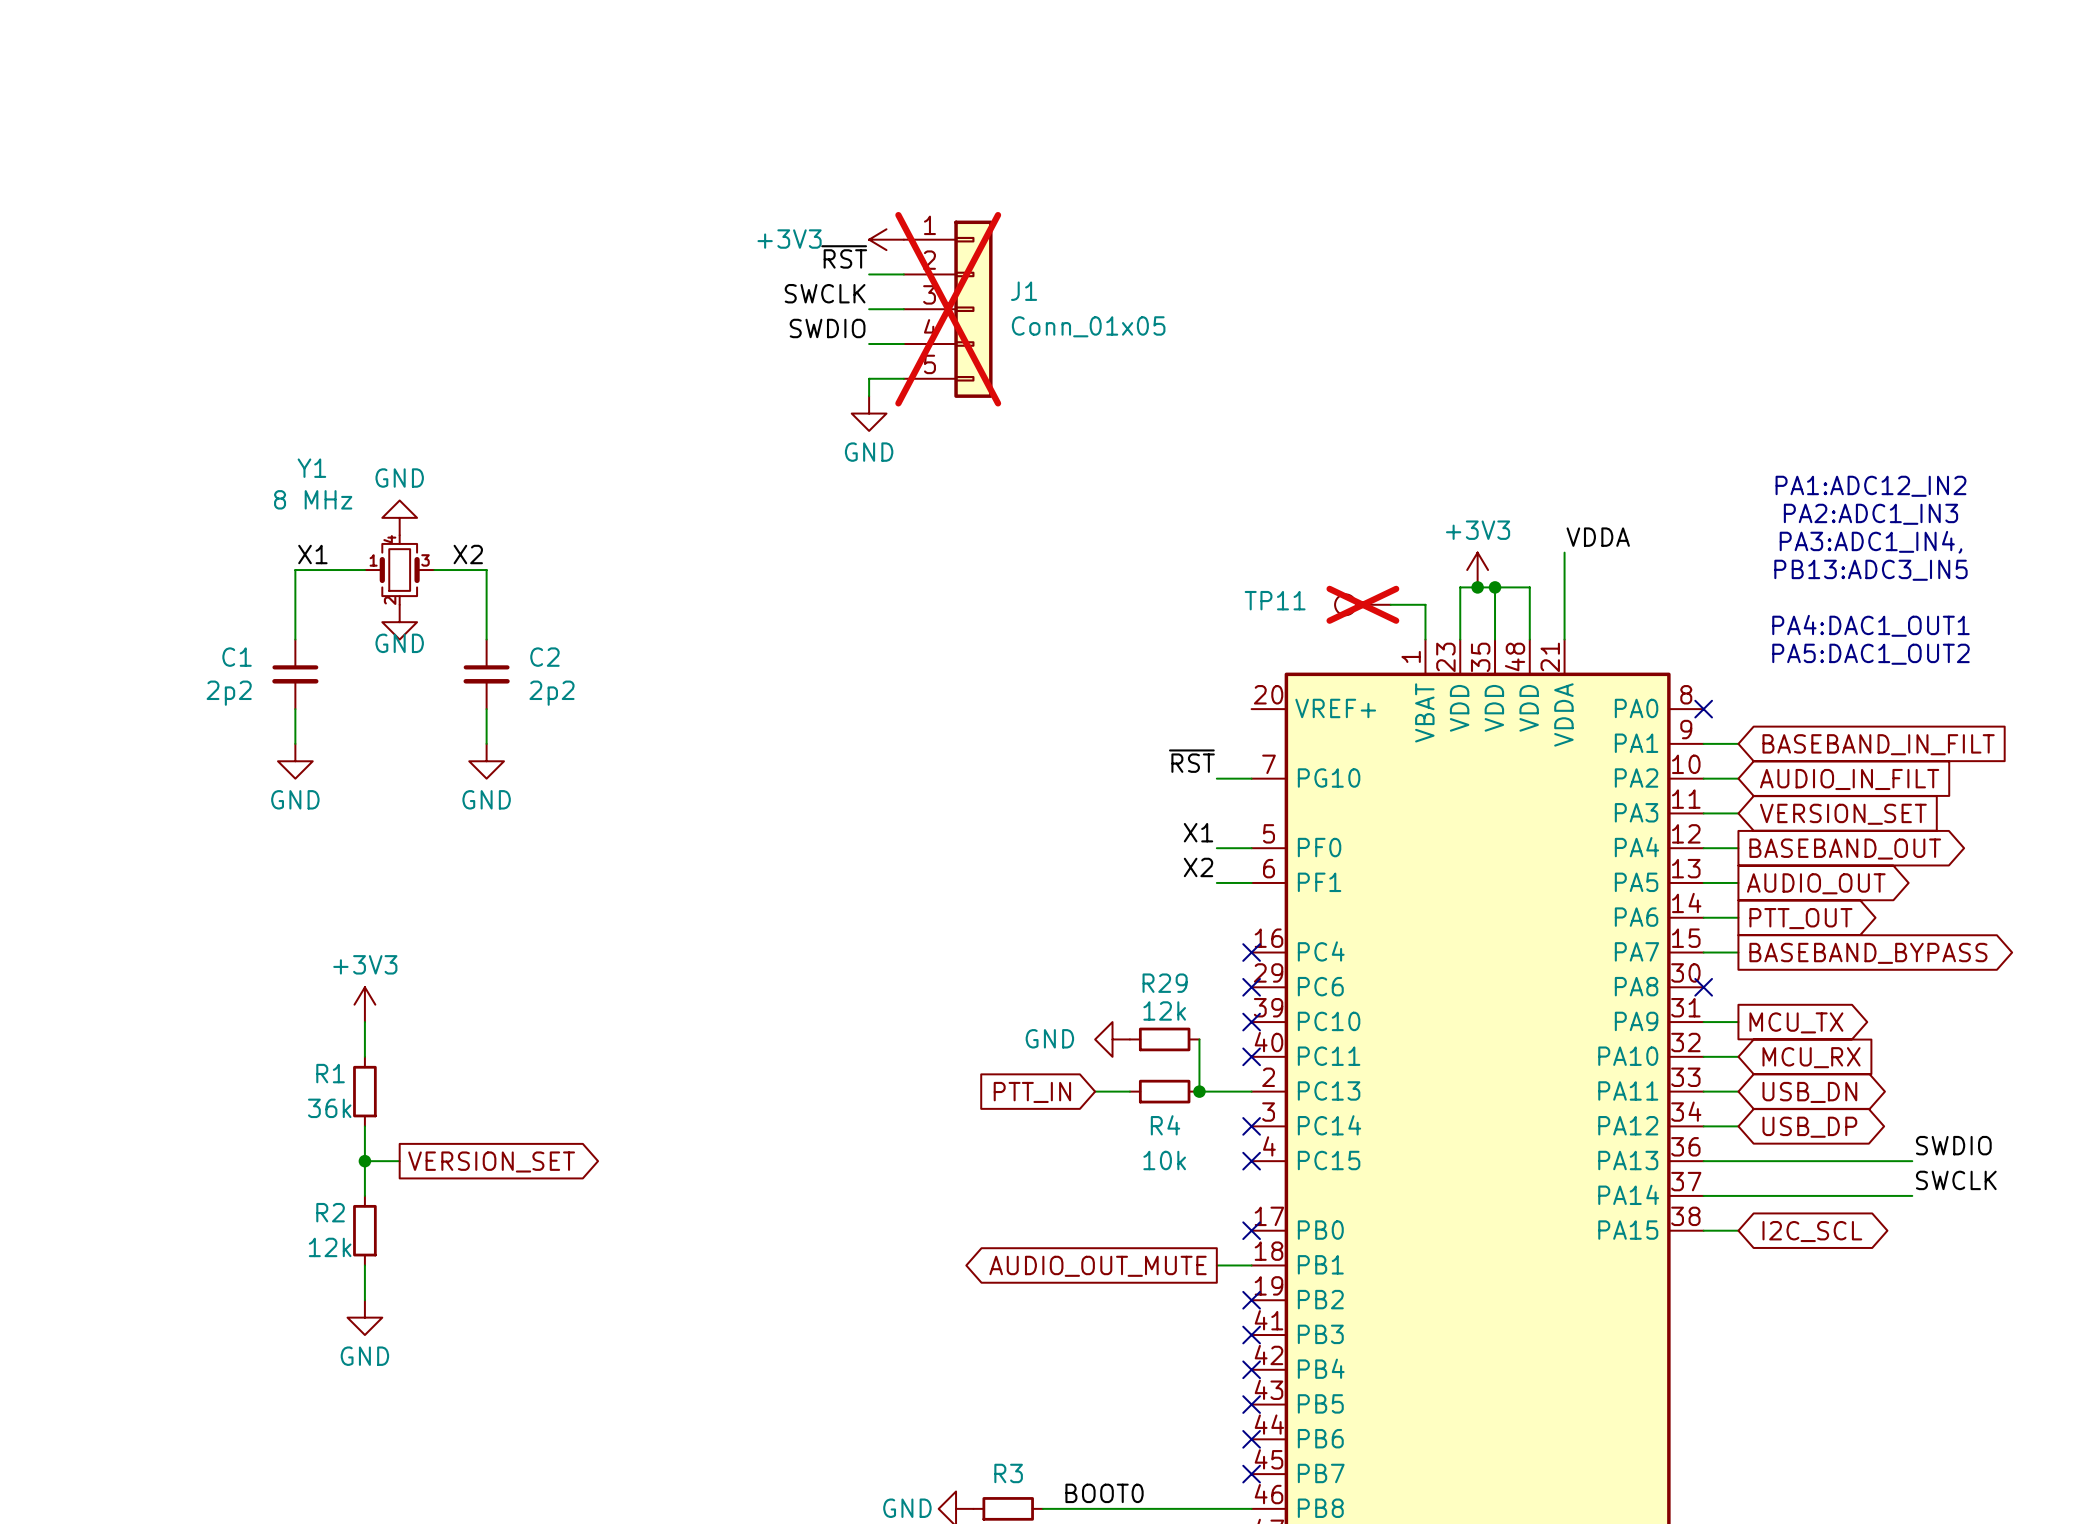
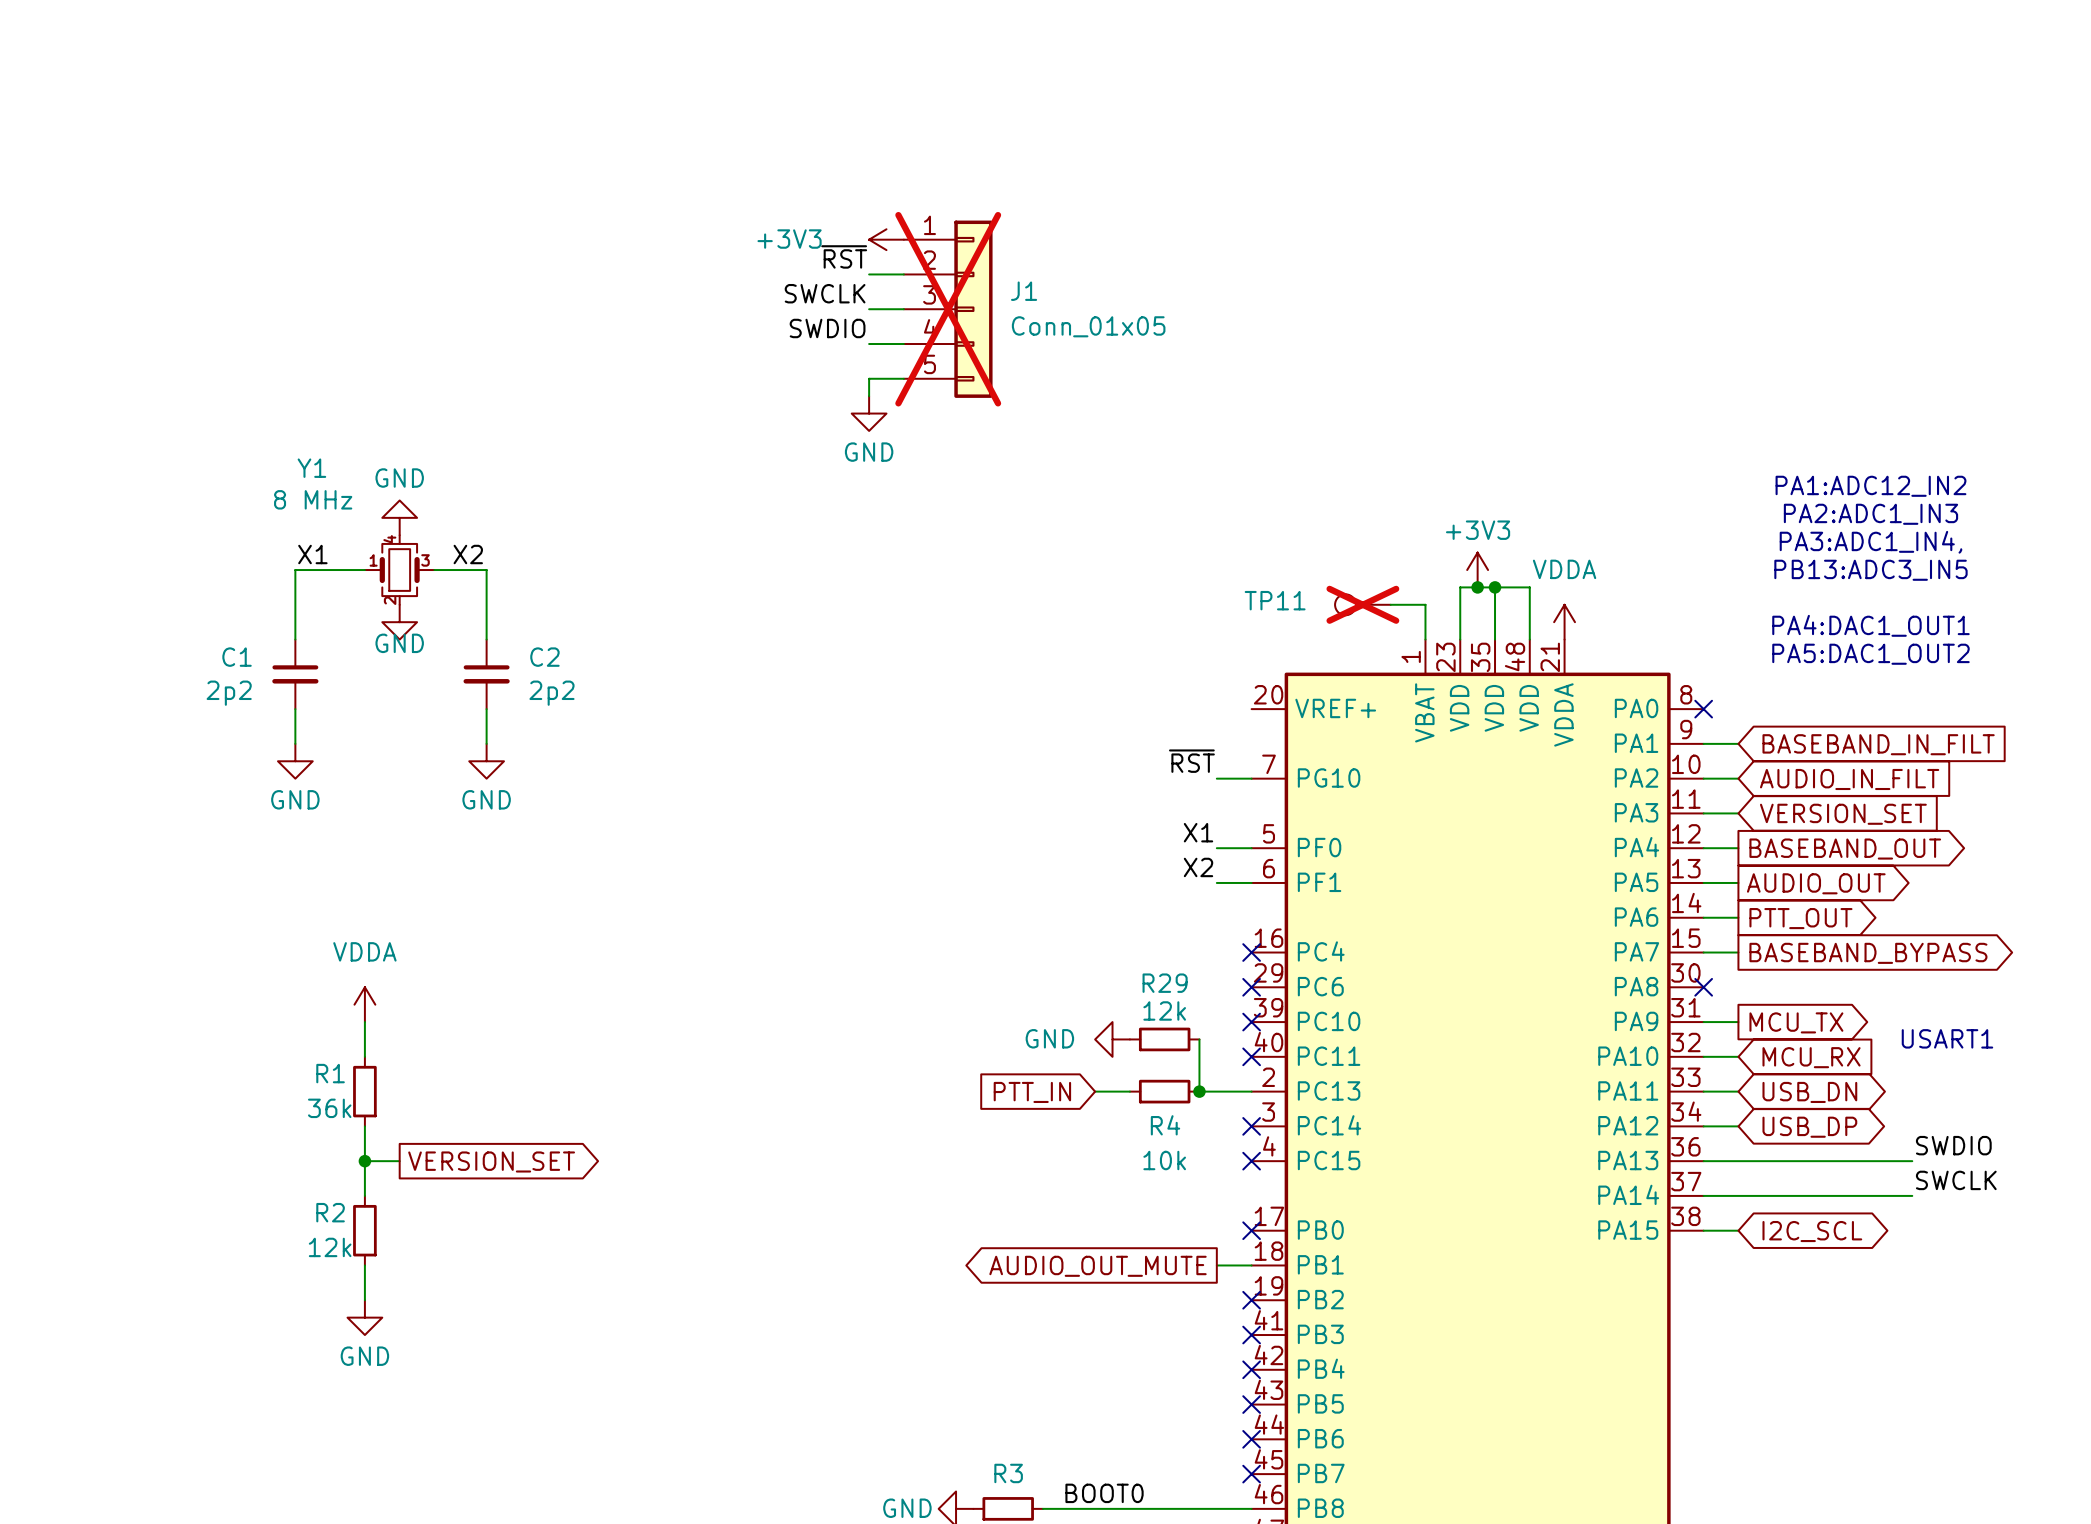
label: VDDA (1598, 537) -> none
wire: (1564, 552) (1564, 639) -> none
power symbol: none -> VDDA (1564, 622)
power symbol: +3V3 (364, 1004) -> VDDA (364, 1004)
text: none -> USART1 (1947, 1038)

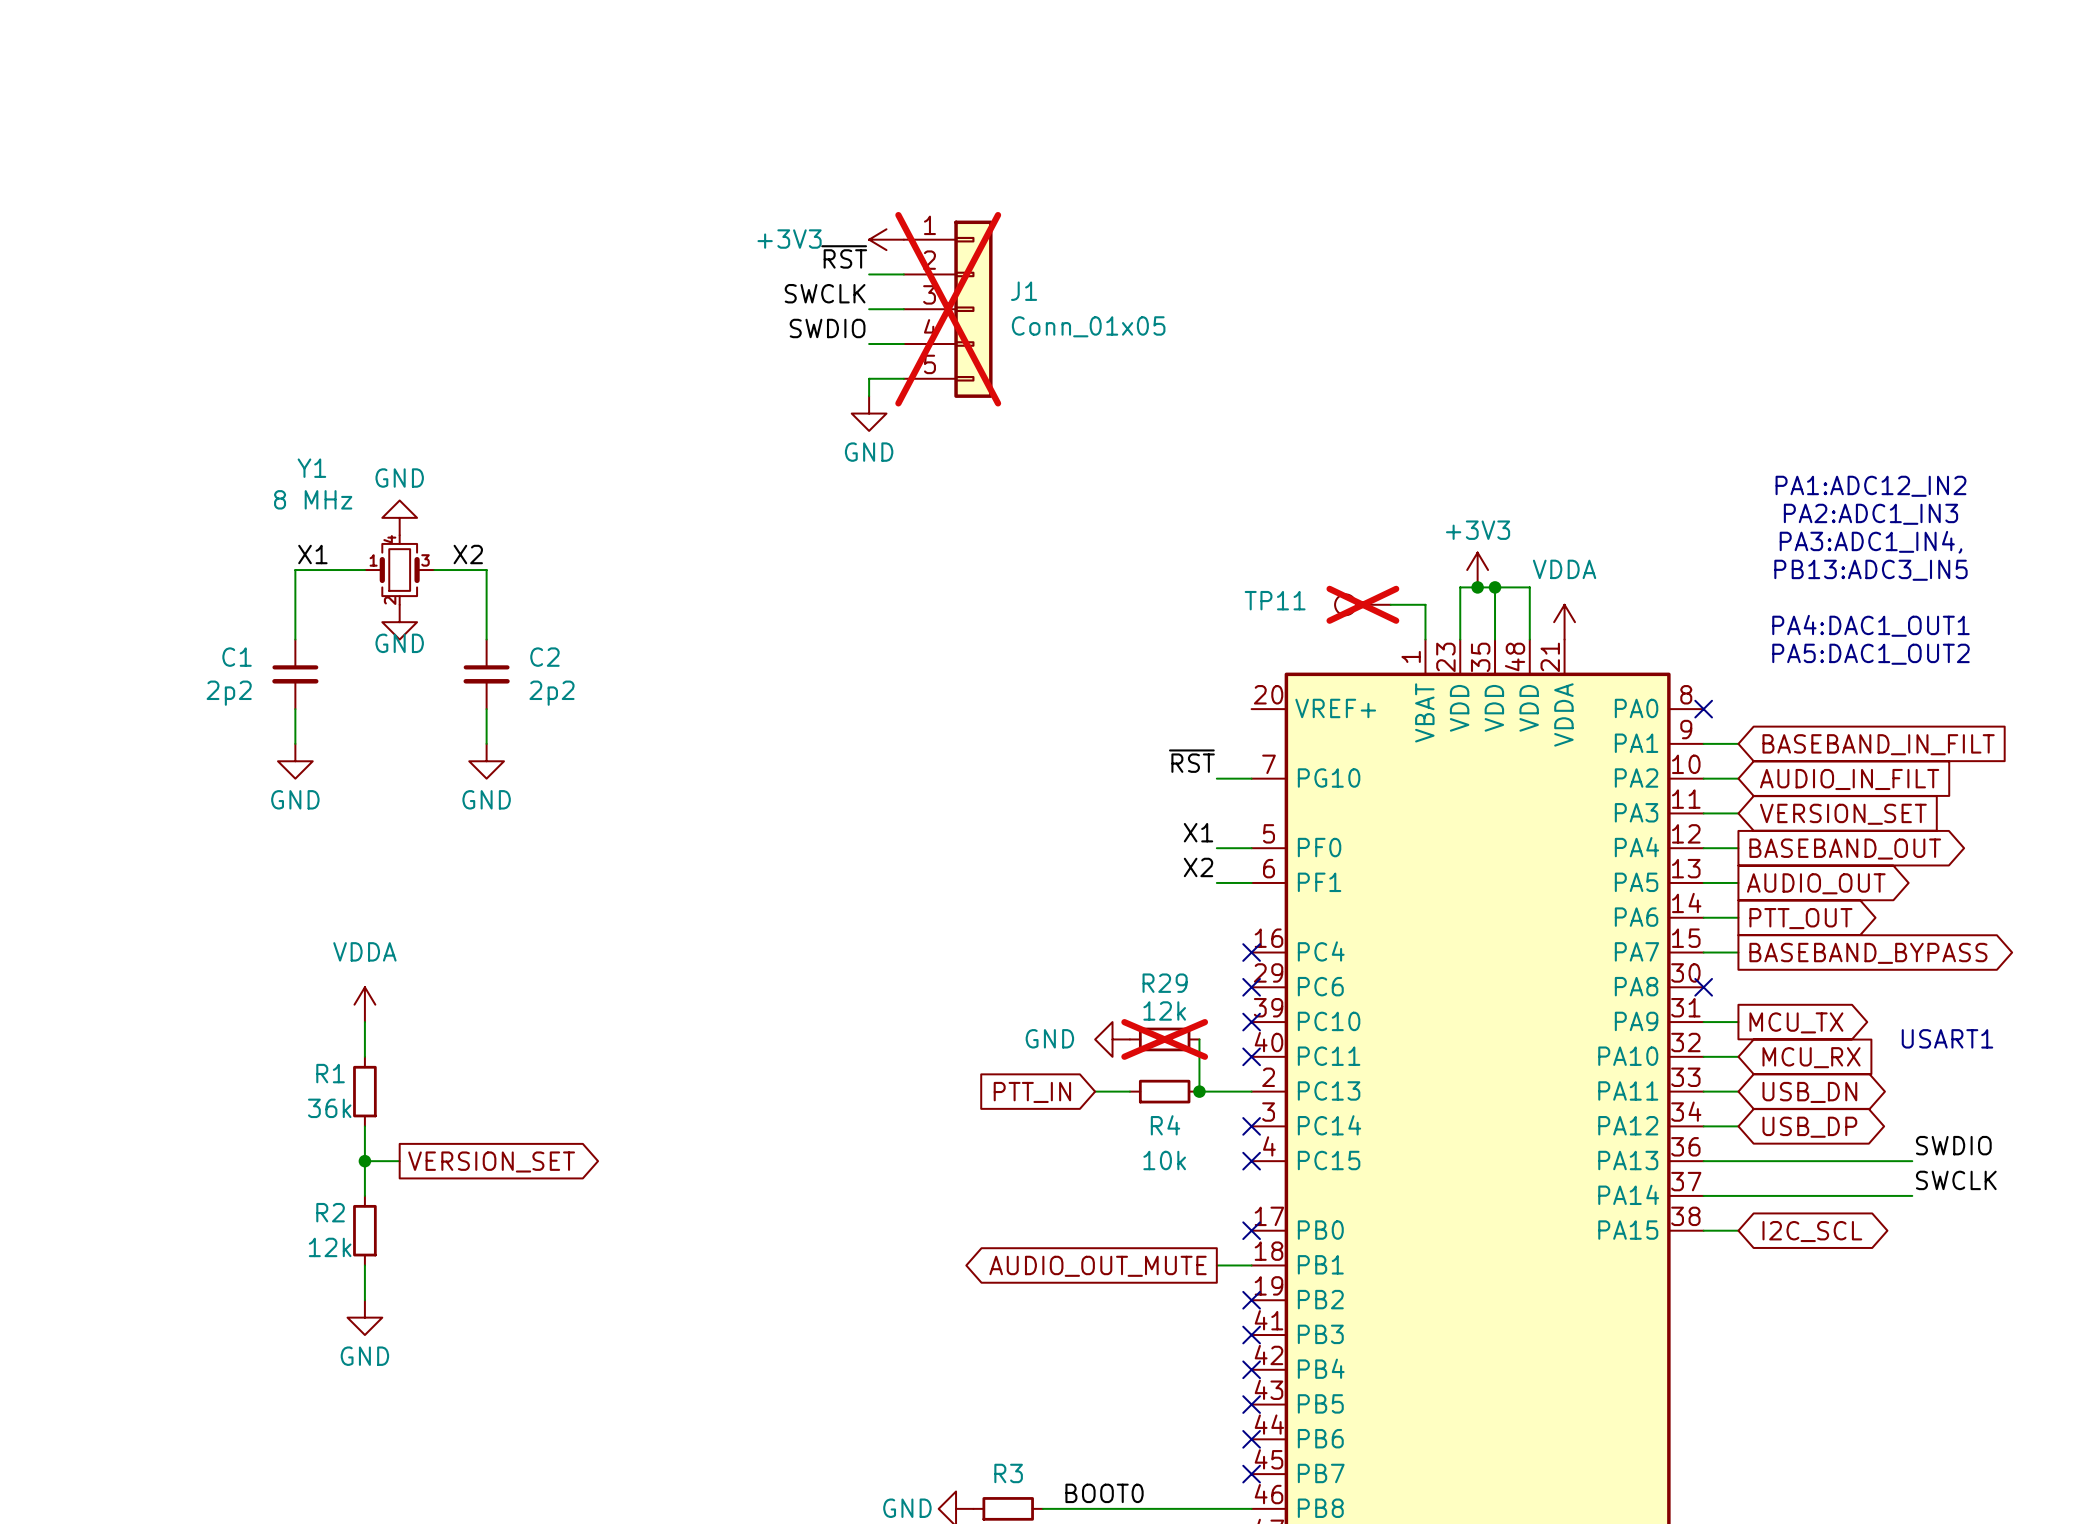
R29 do-not-place cross: none -> (1164, 1039)

